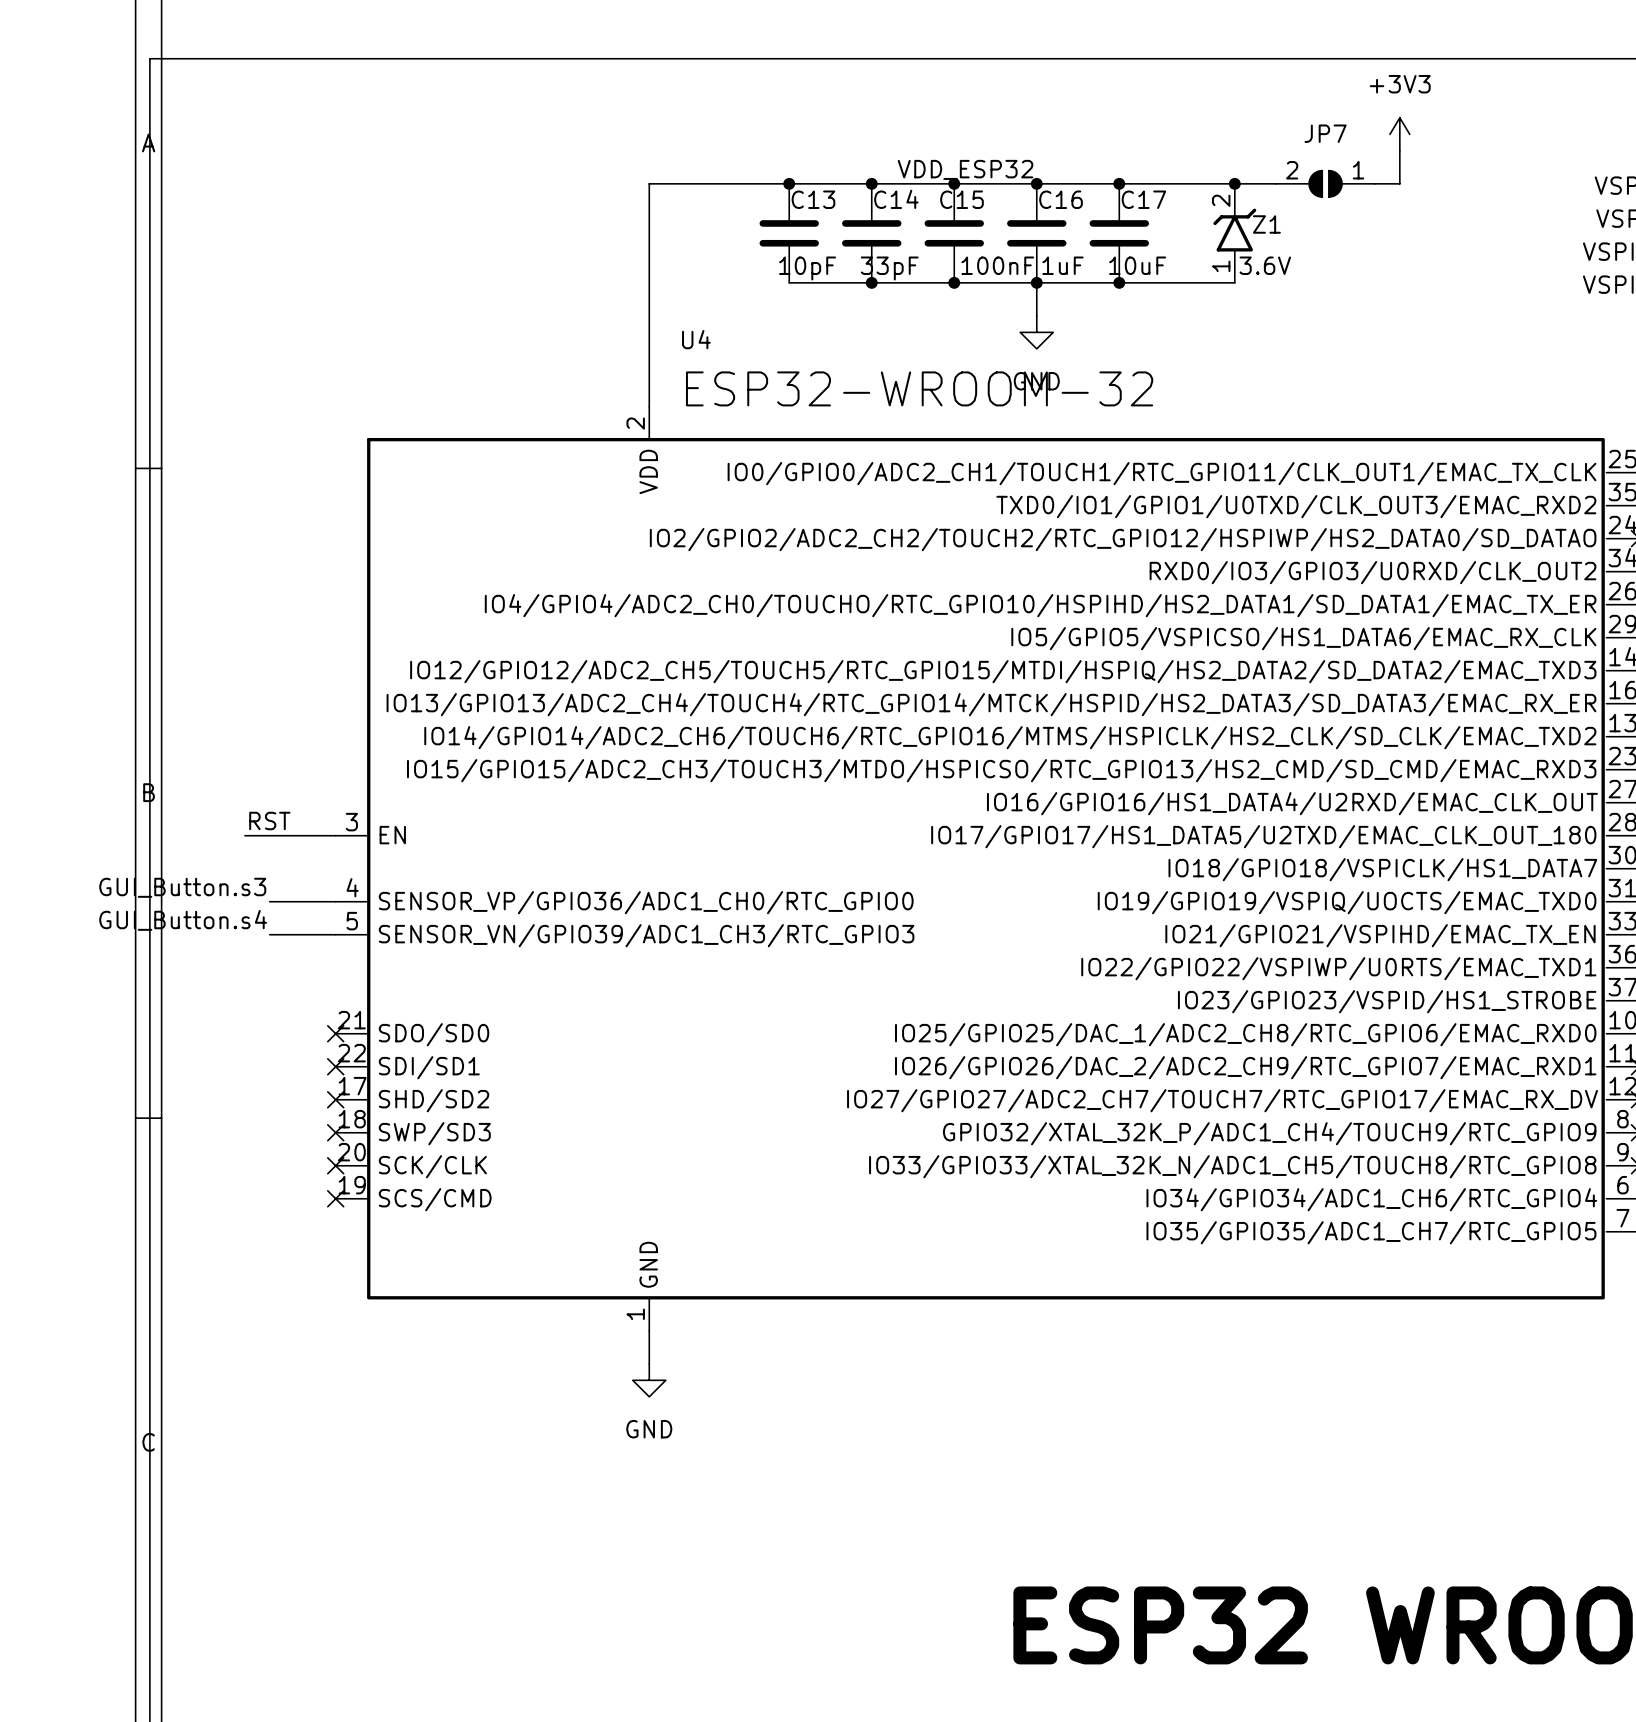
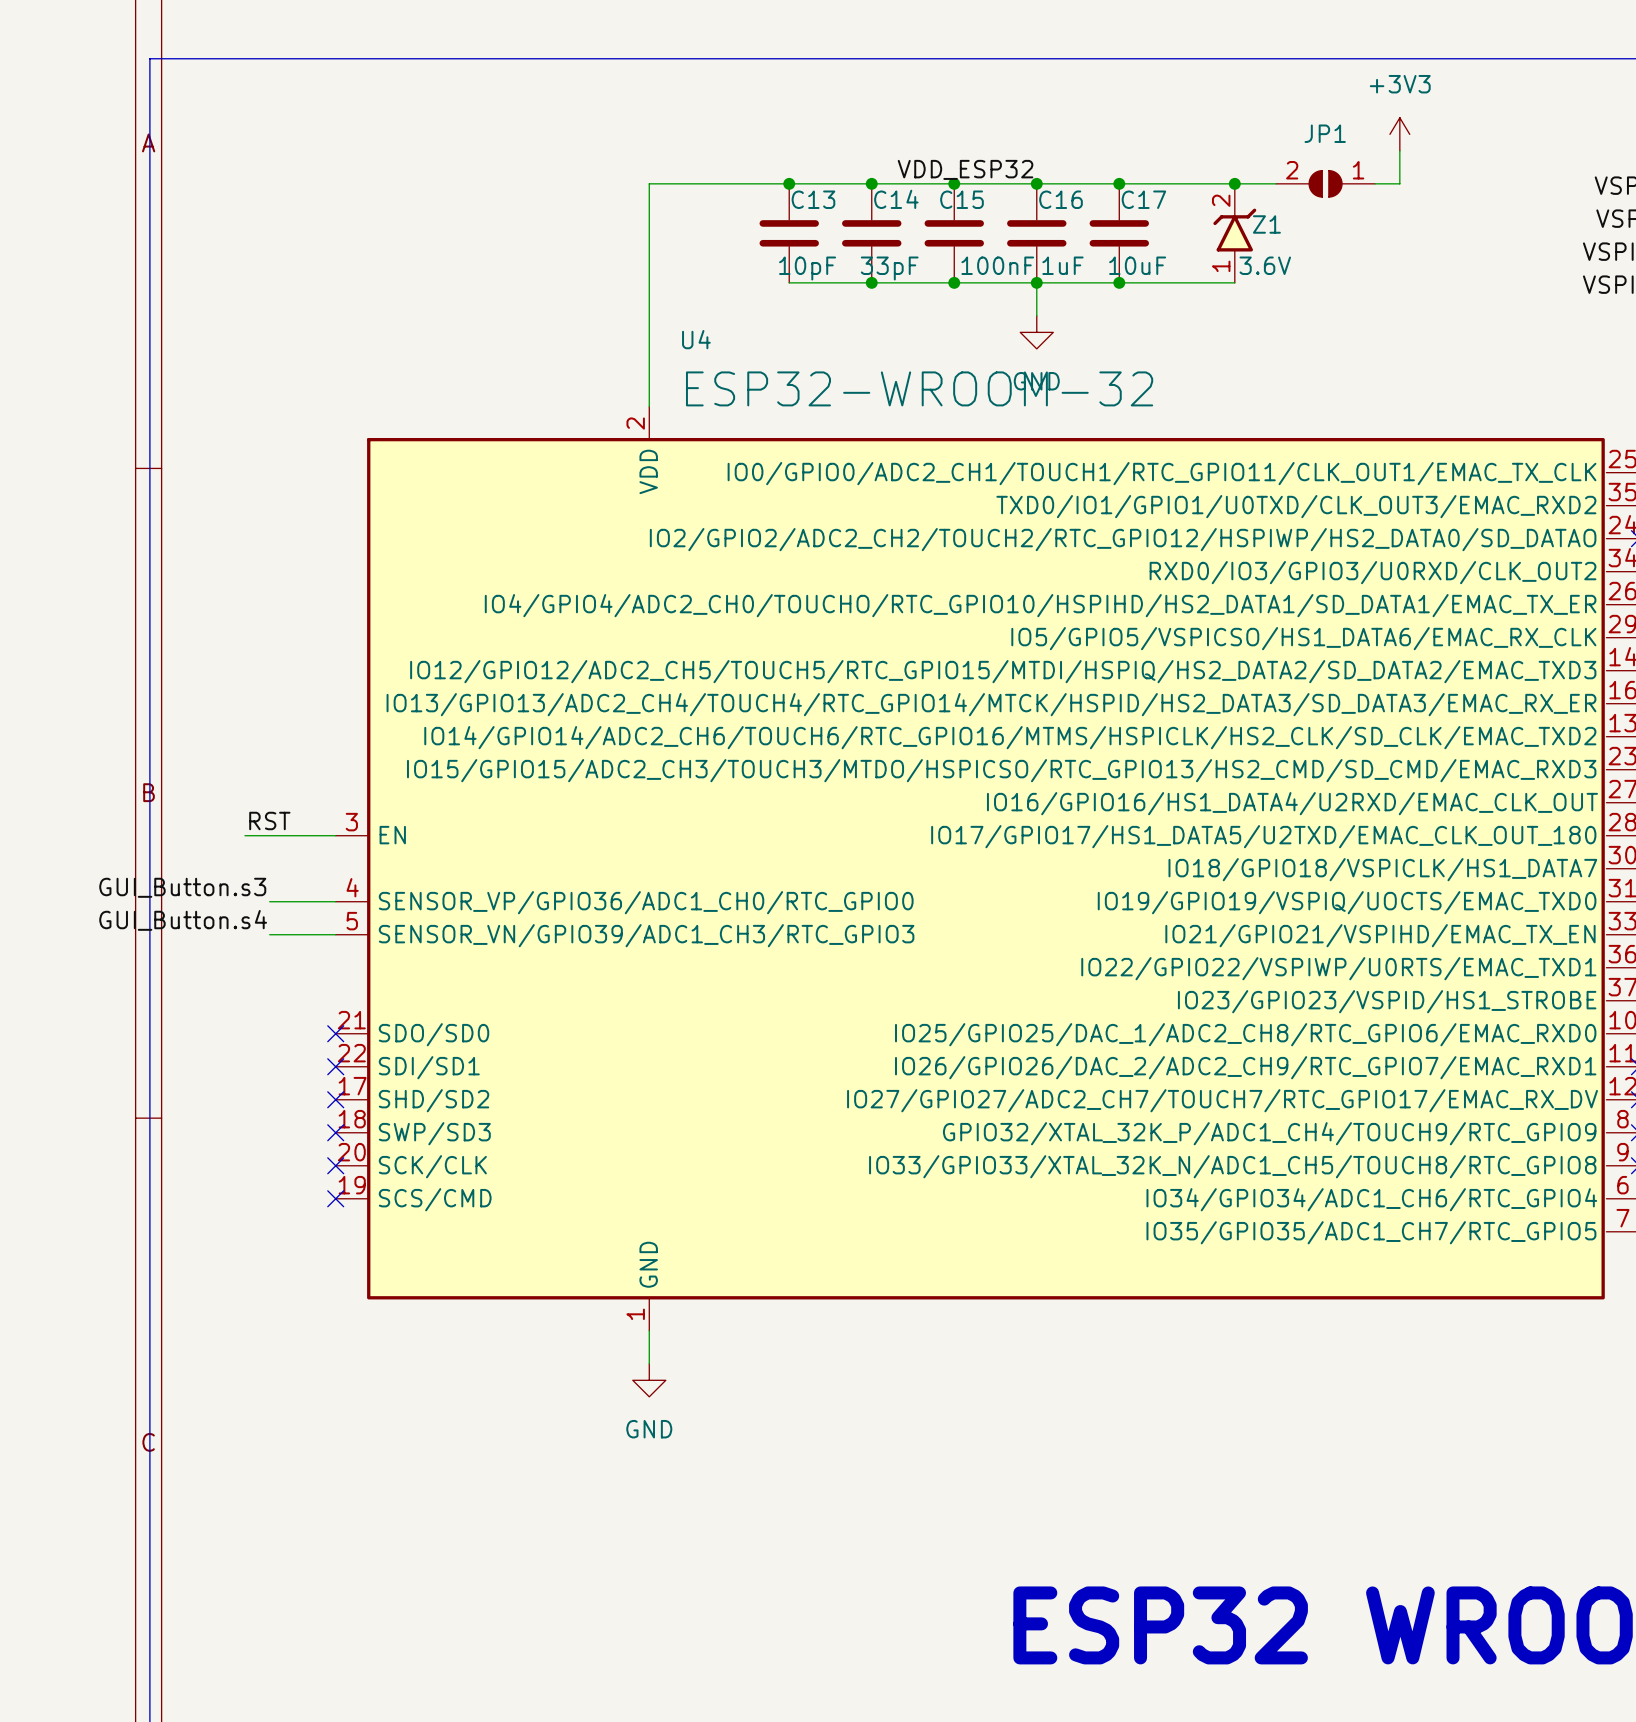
JP7 name: JP7 (1325, 133) -> JP1 (1325, 133)

